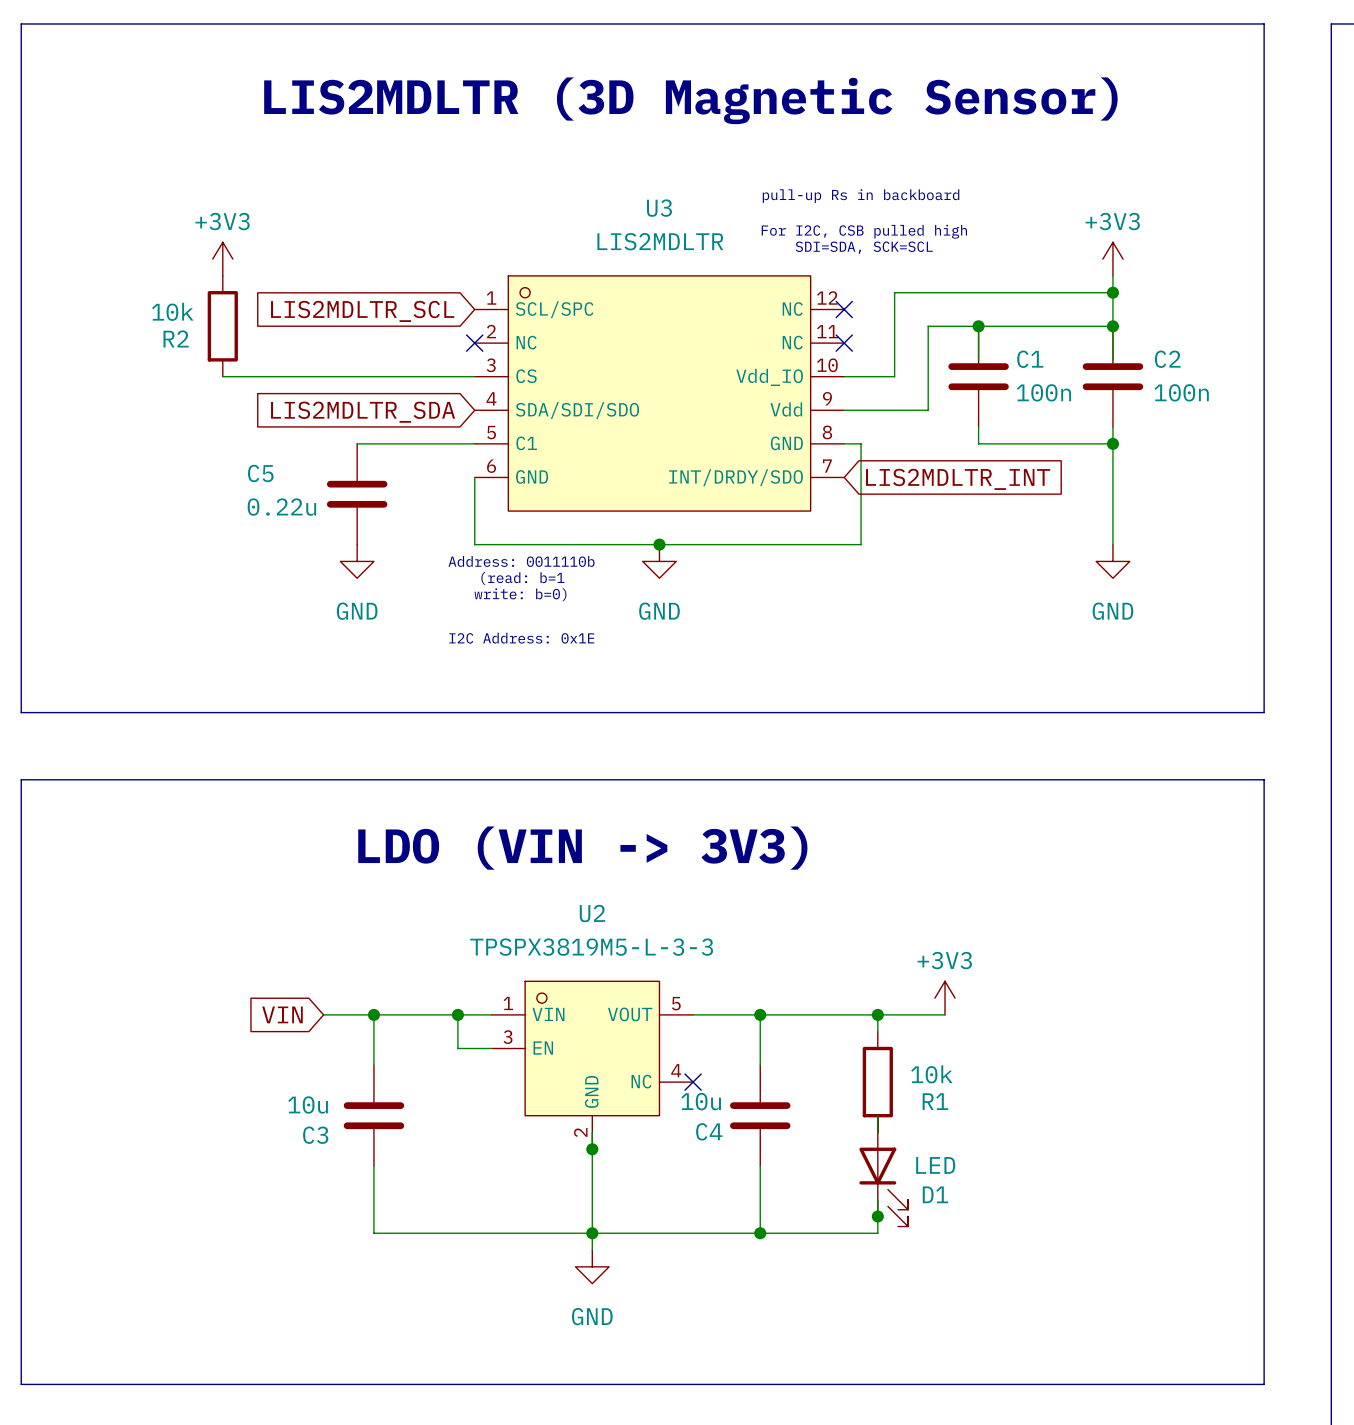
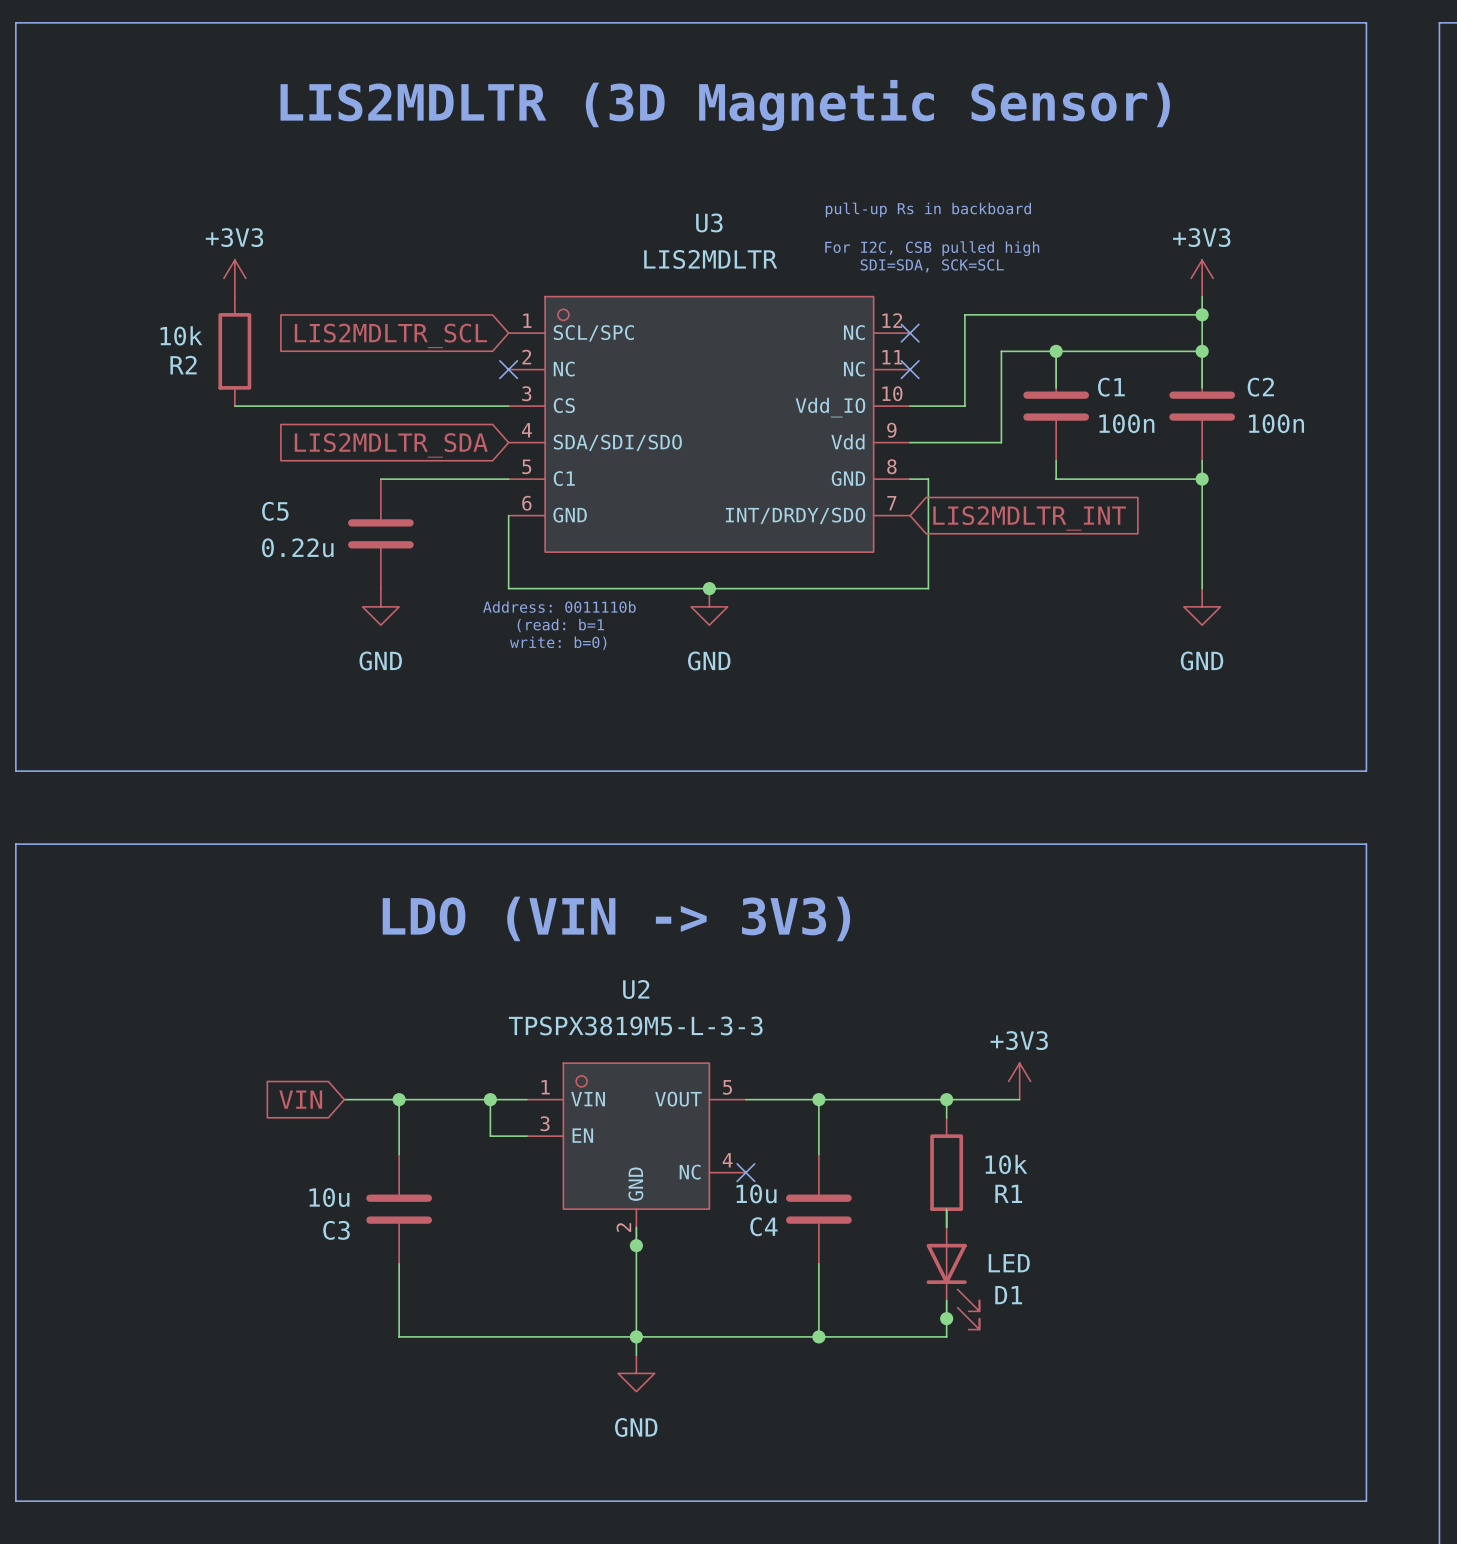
text: I2C Address: 0x1E (521, 638) -> none

